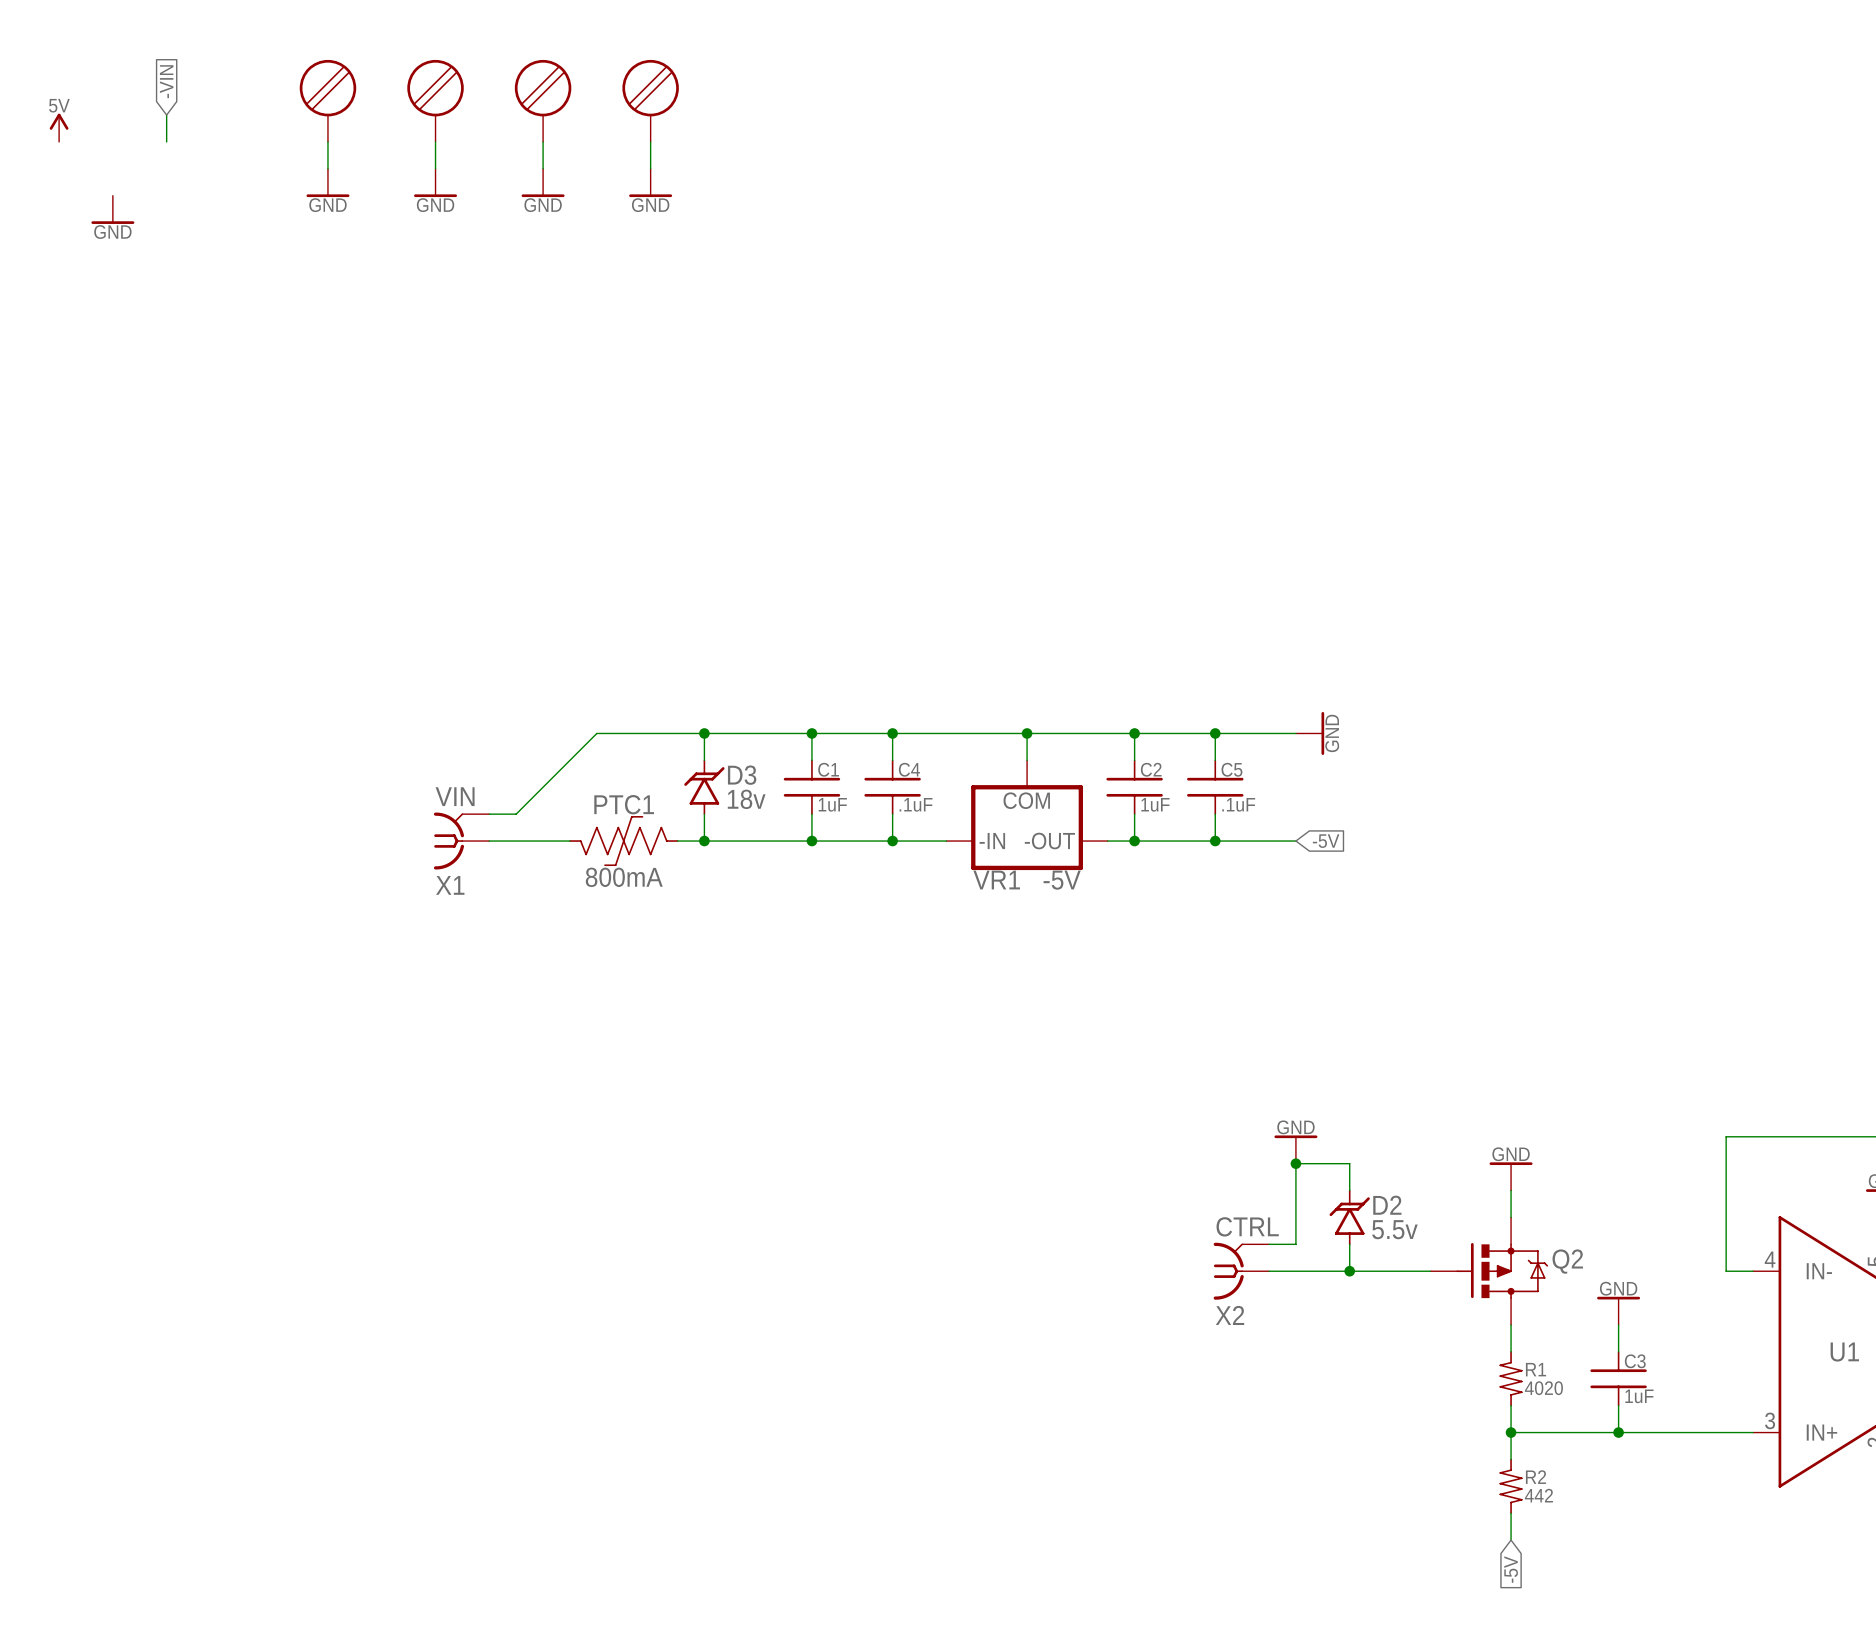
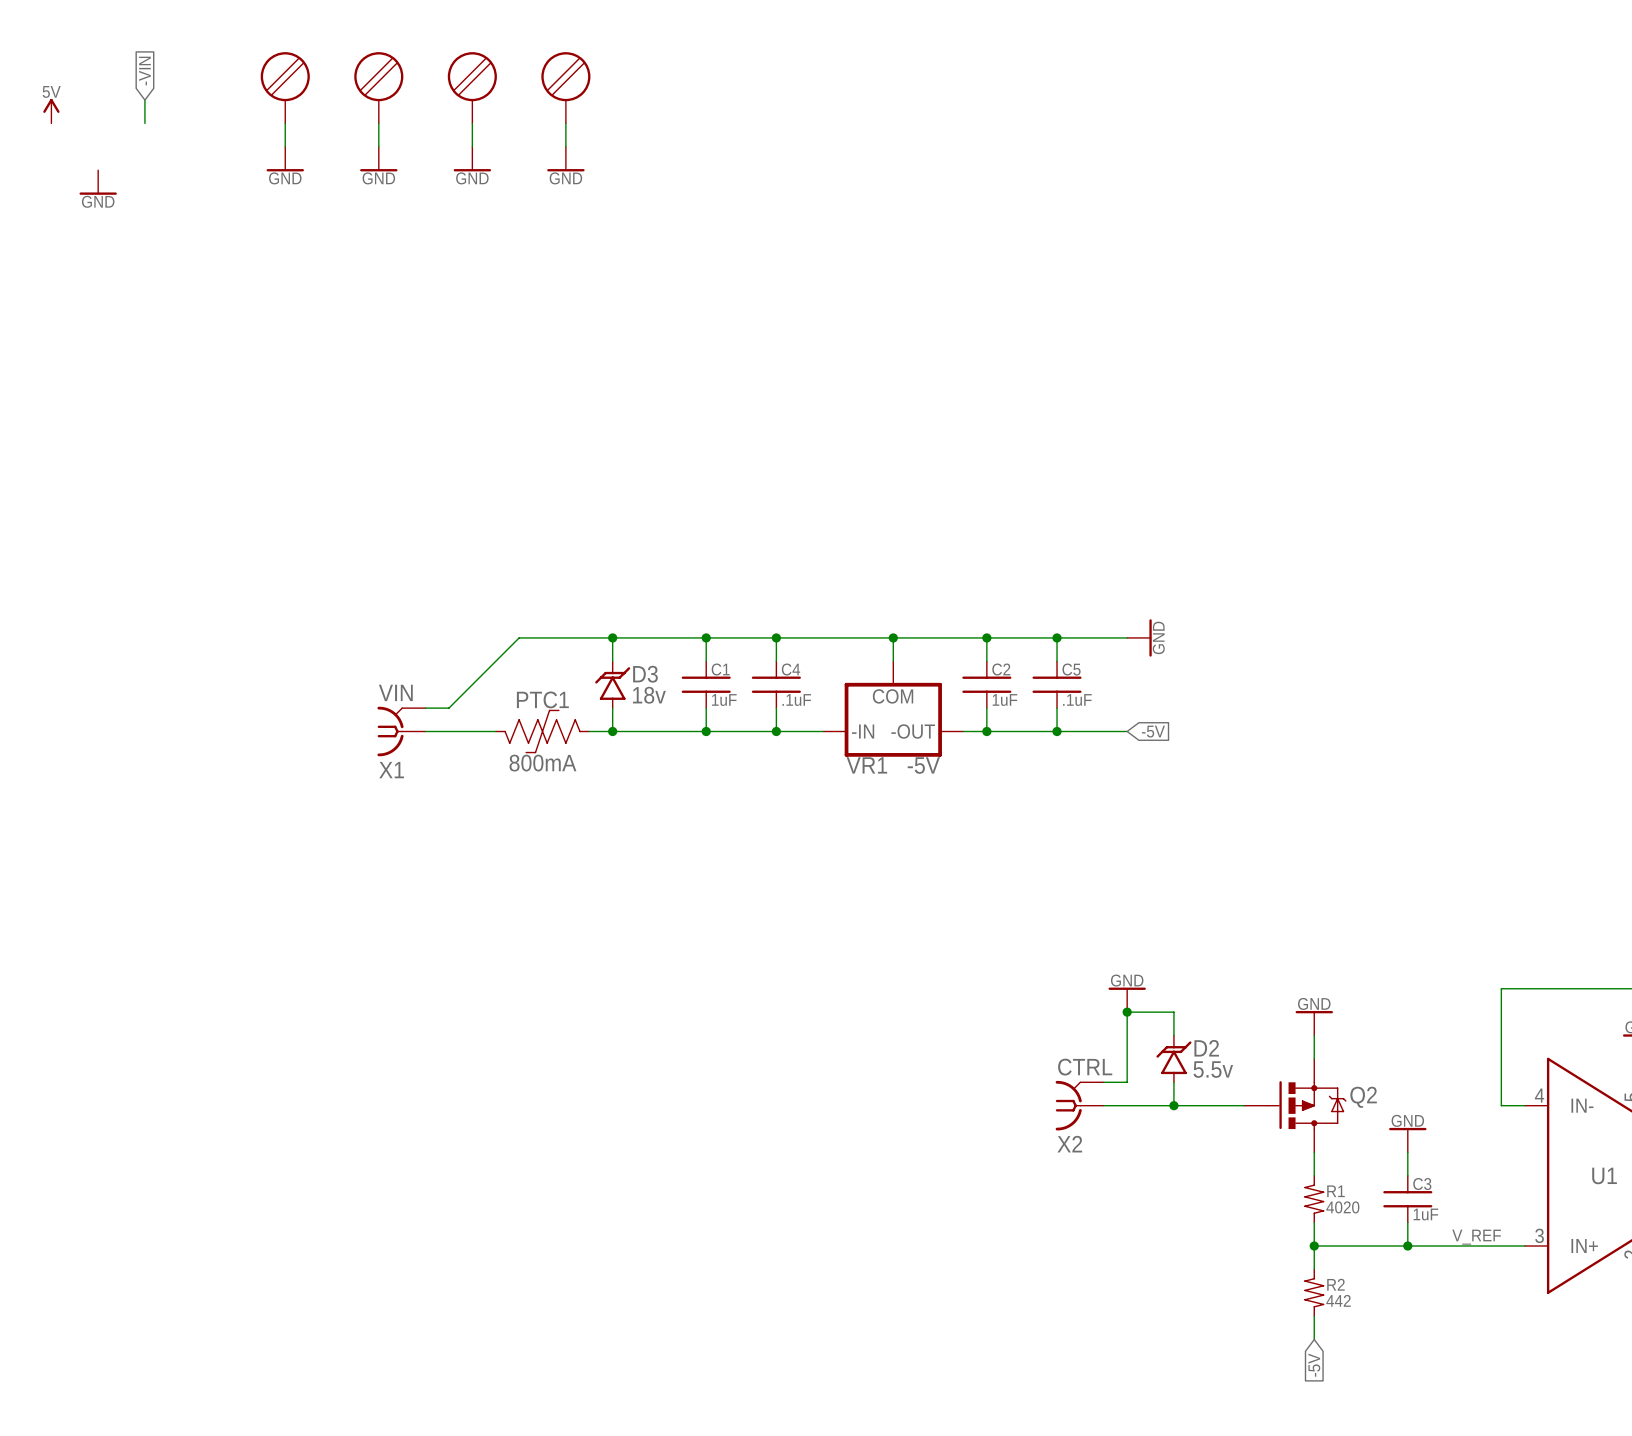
label: none -> V_REF (1476, 1237)

